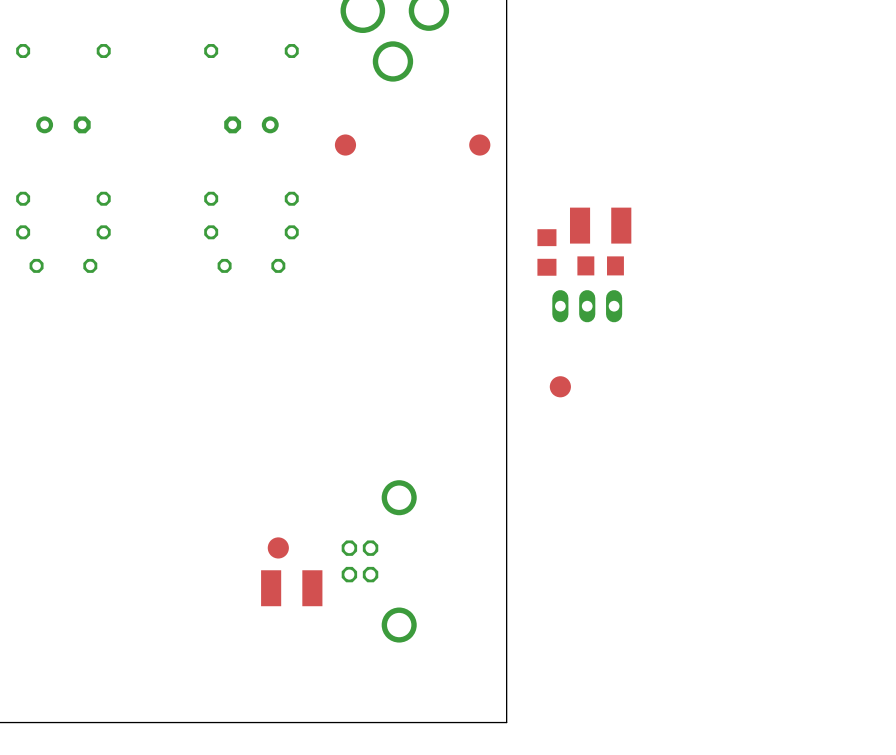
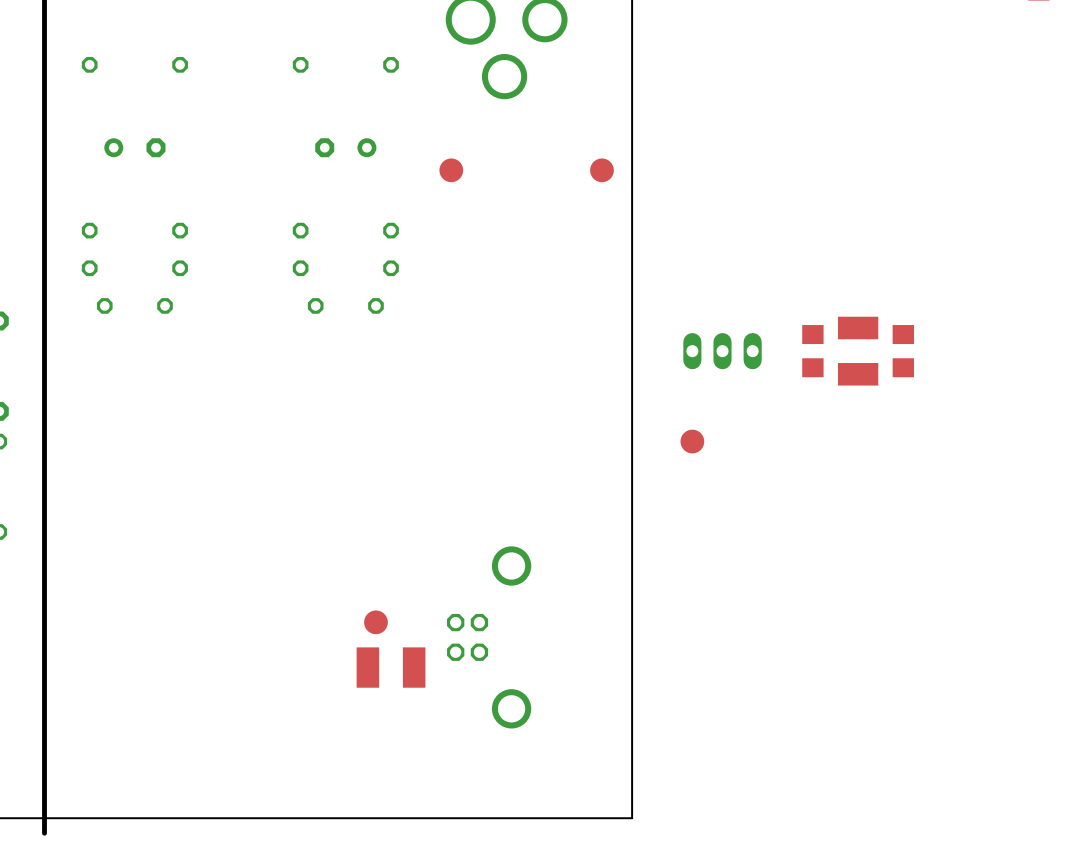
part rotation: 0° (600, 225) -> 90° clockwise (858, 351)
part position: (600, 225) -> (858, 351)
part: (546, 252) -> none
part: (600, 265) -> none
part: none -> (812, 351)
part: none -> (903, 351)

